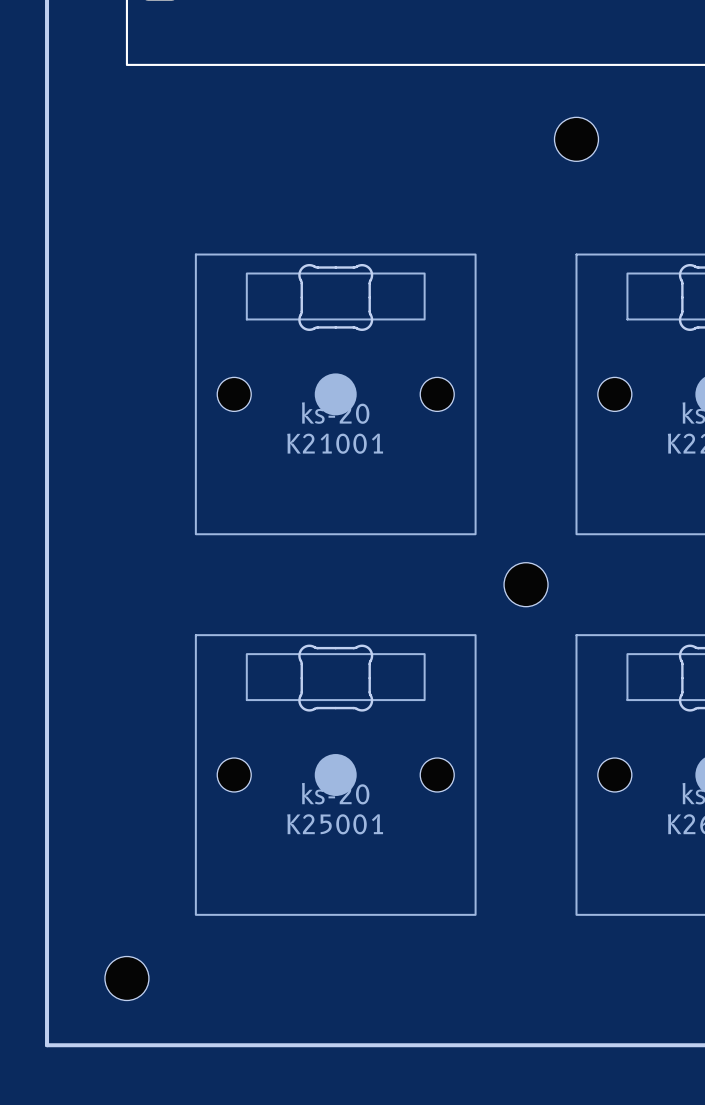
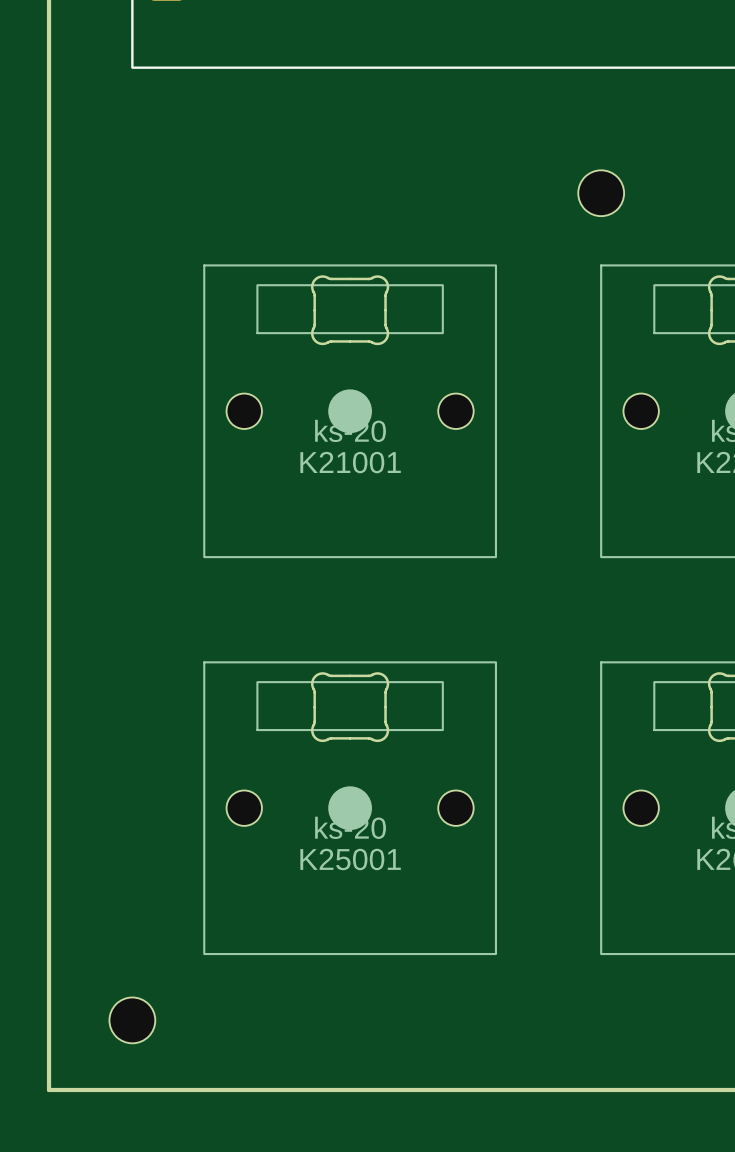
part position: (576, 139) -> (601, 193)
part: (526, 584) -> none

